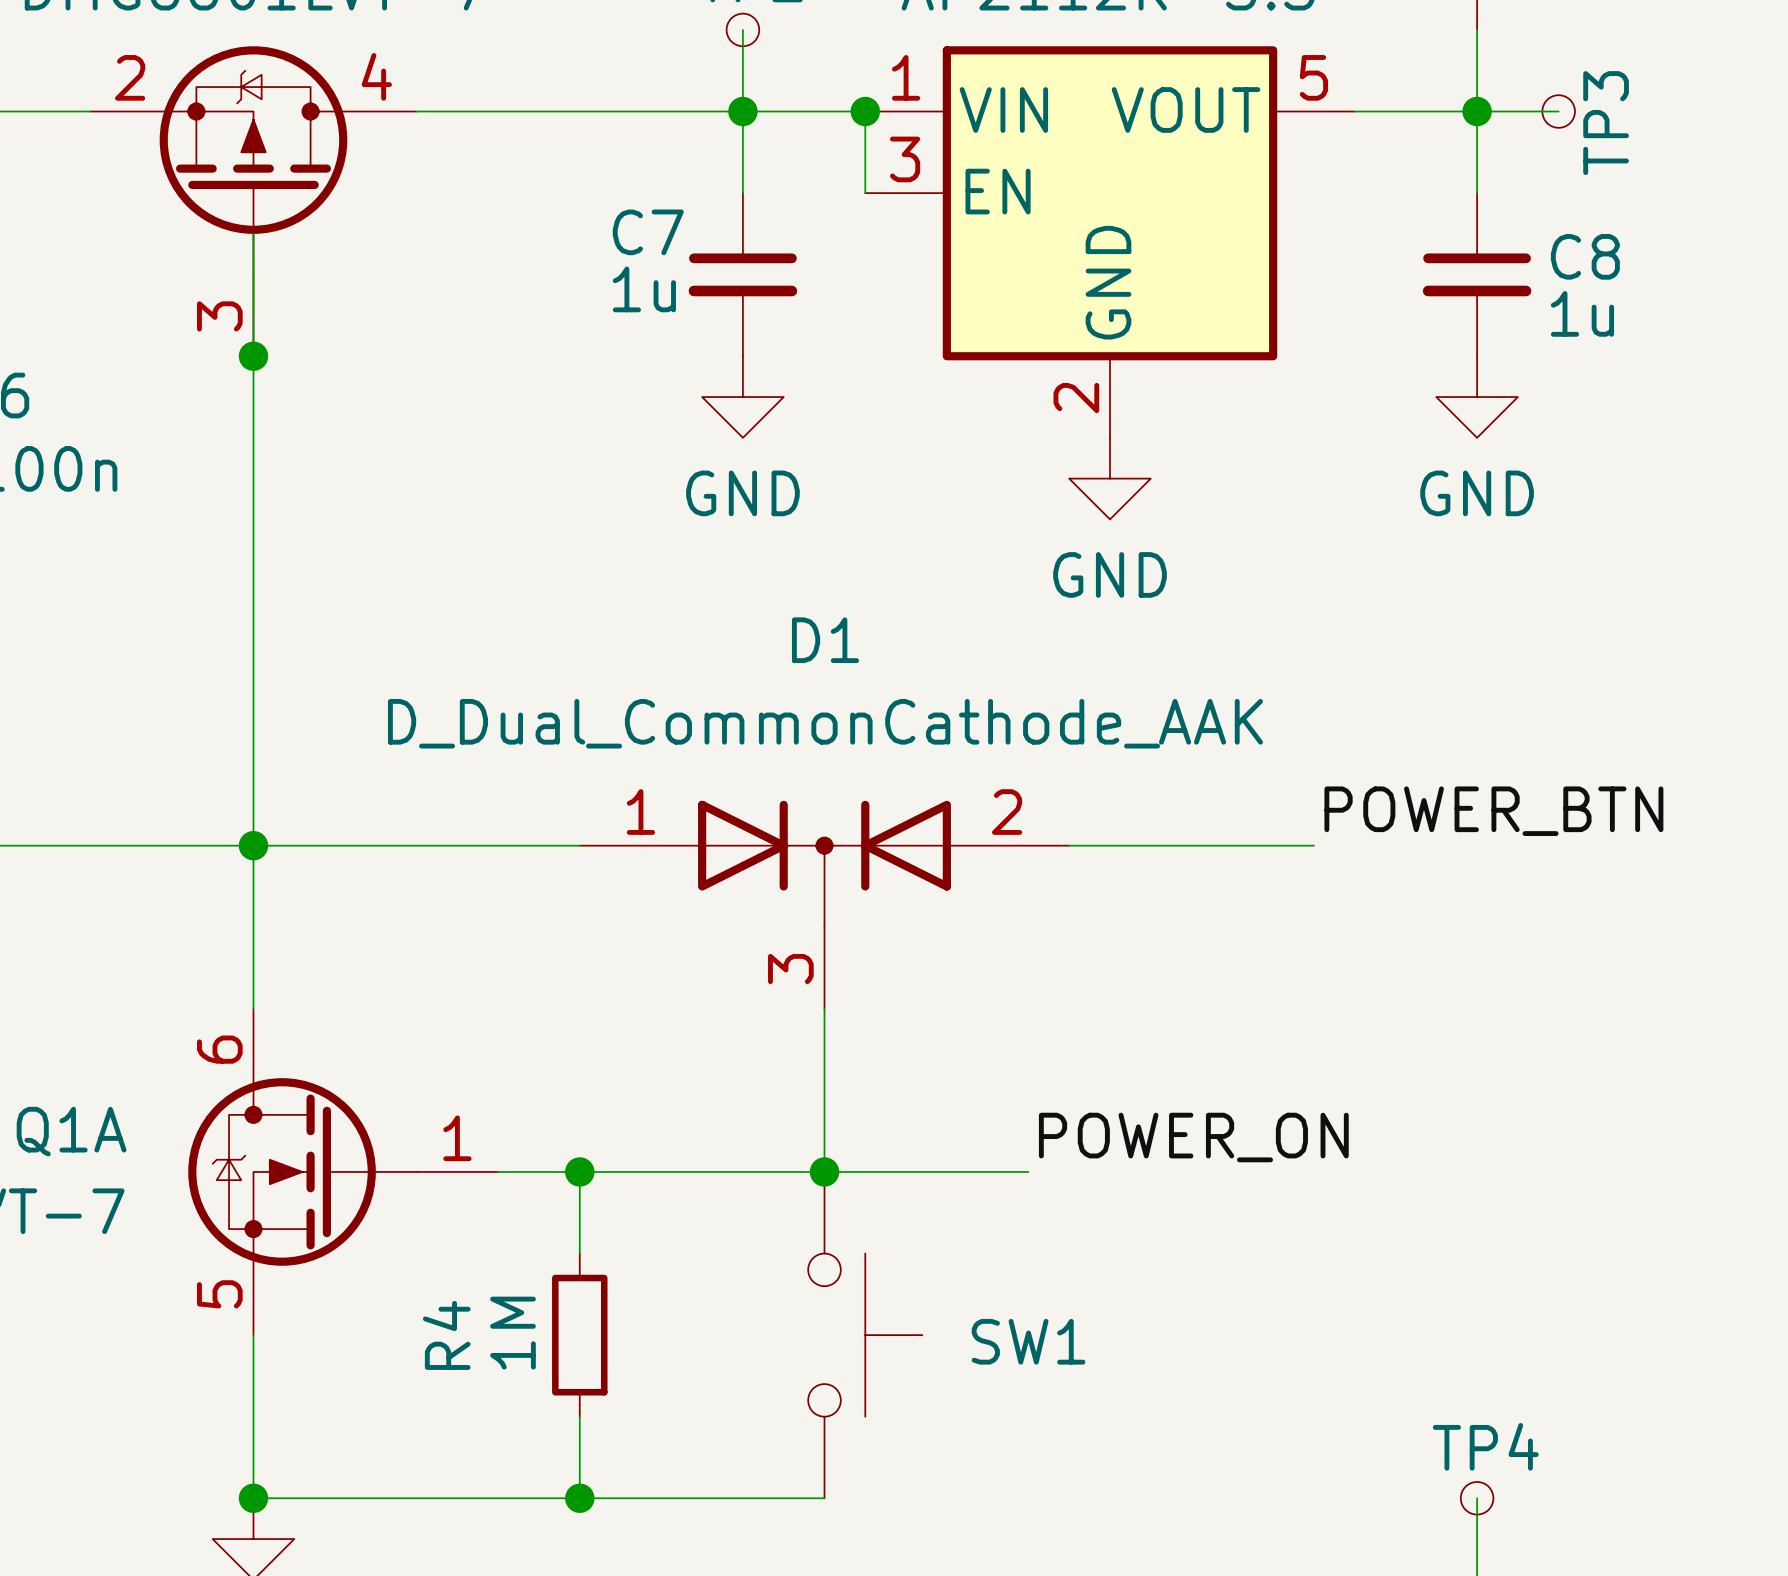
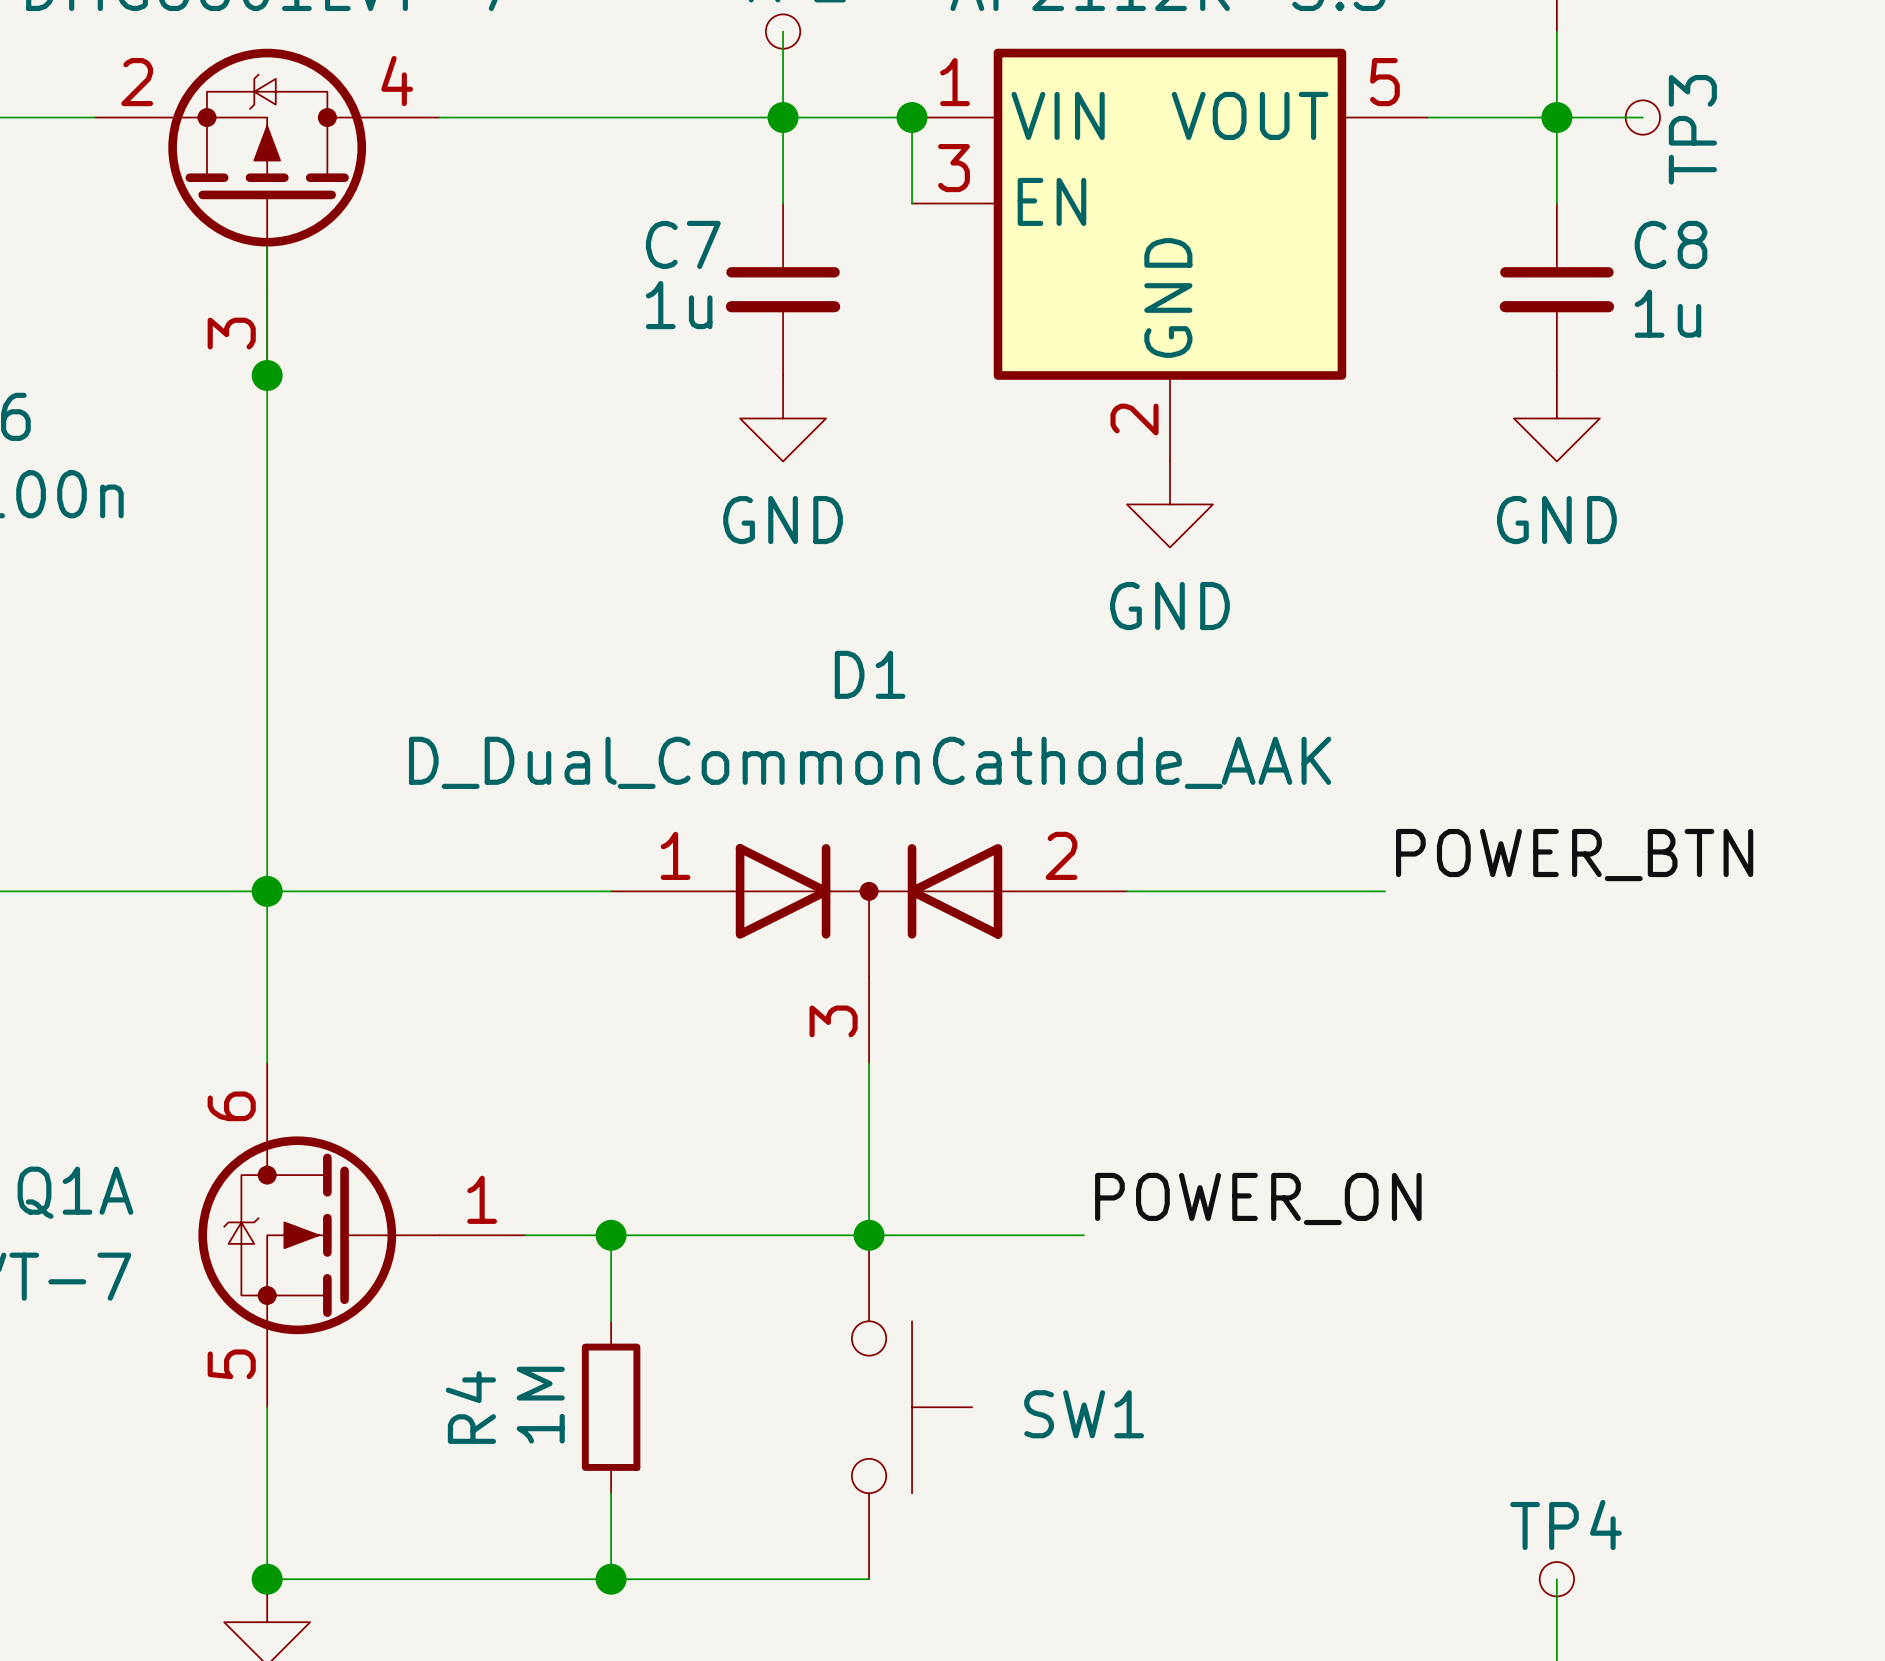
C8 name position: C8 (1585, 256) -> C8 (1671, 244)
C8 value position: 1u (1582, 313) -> 1u (1667, 313)

